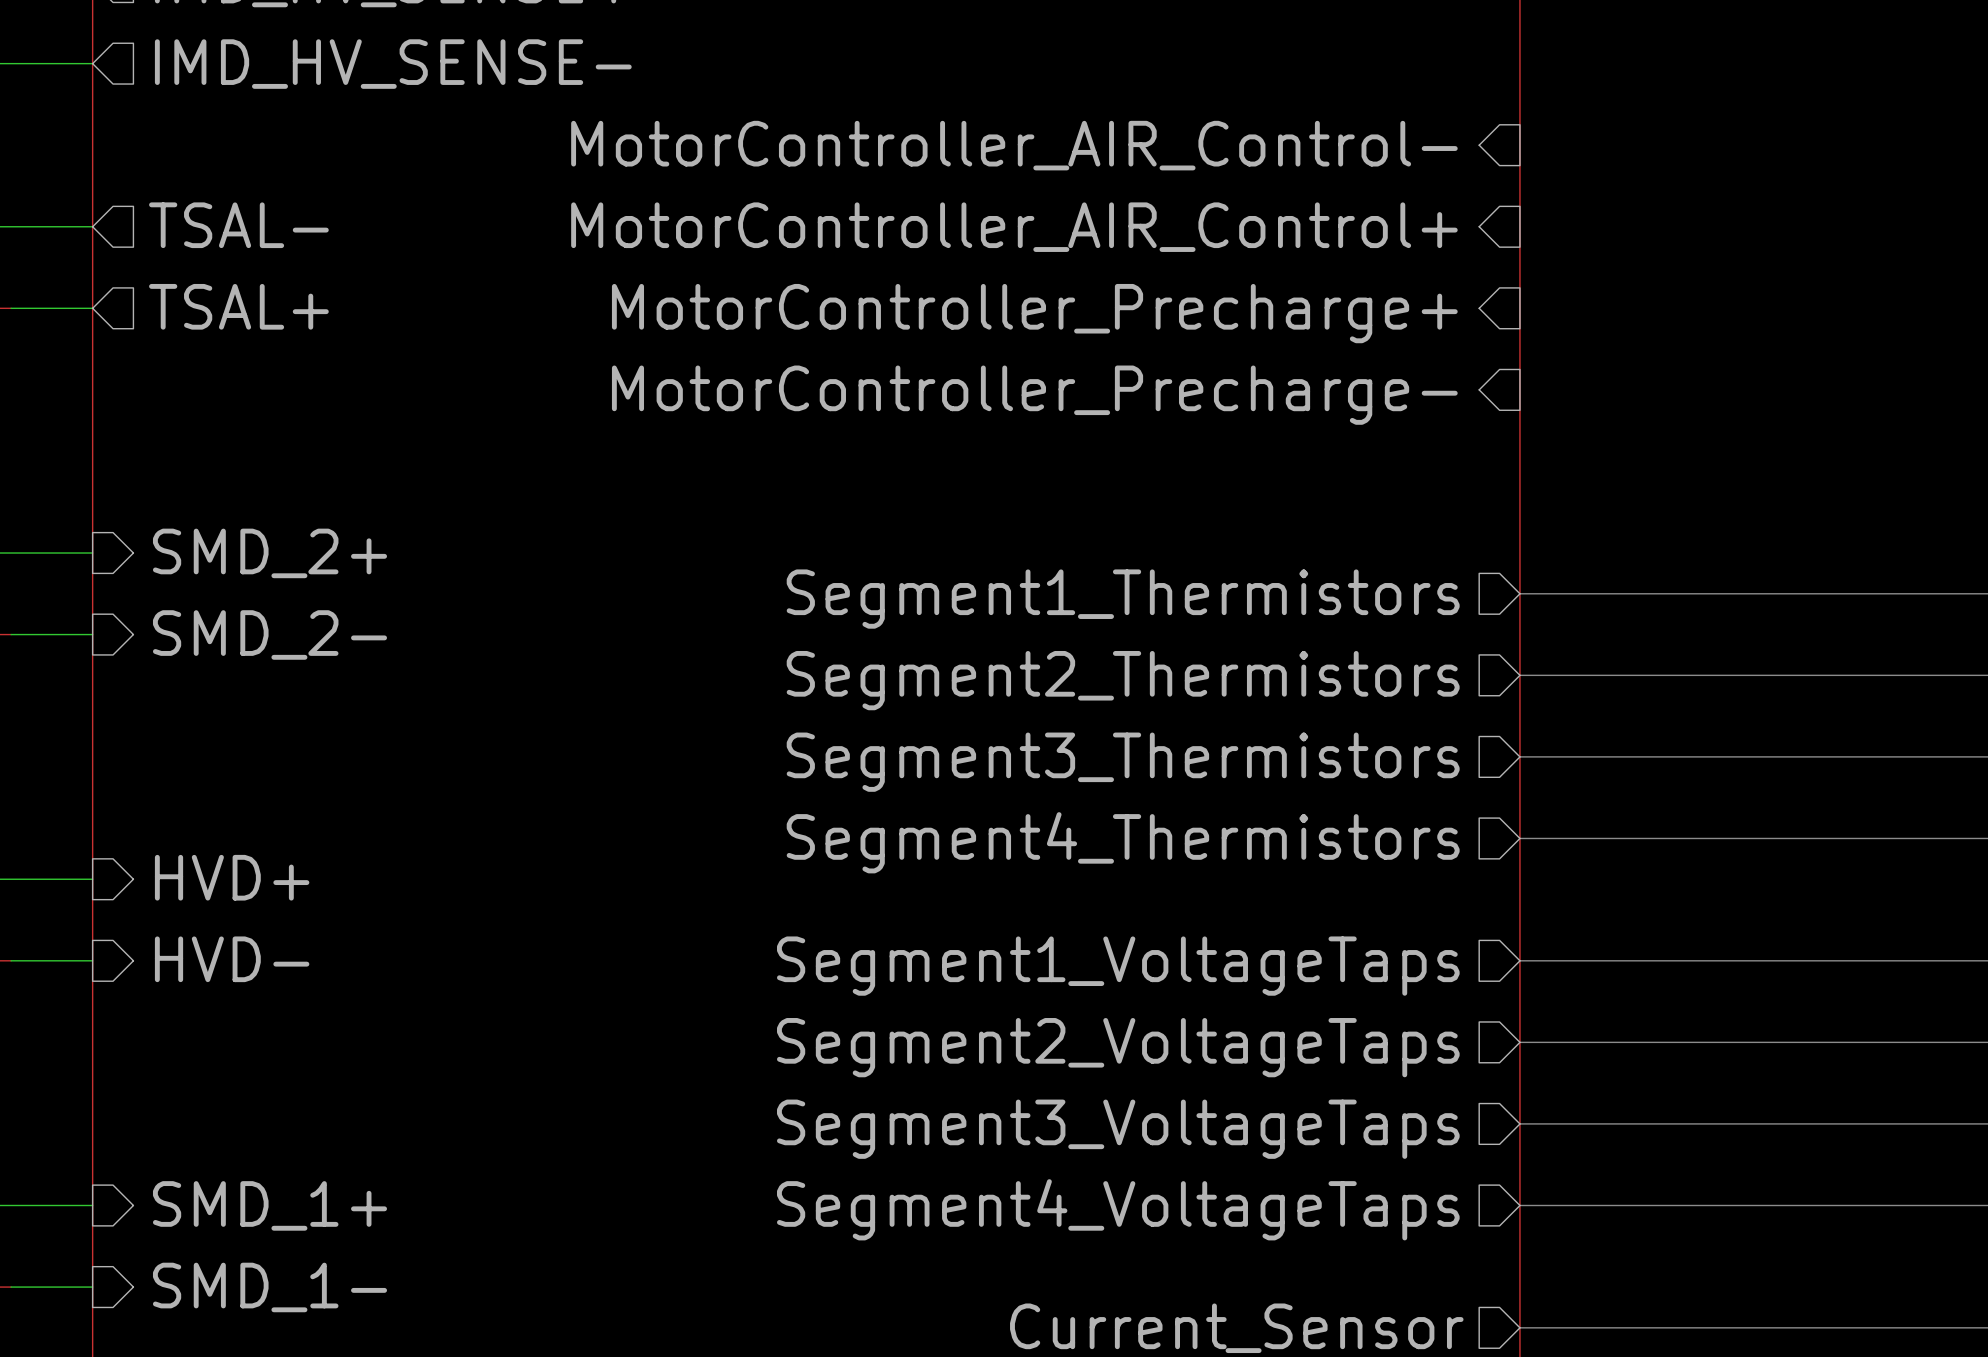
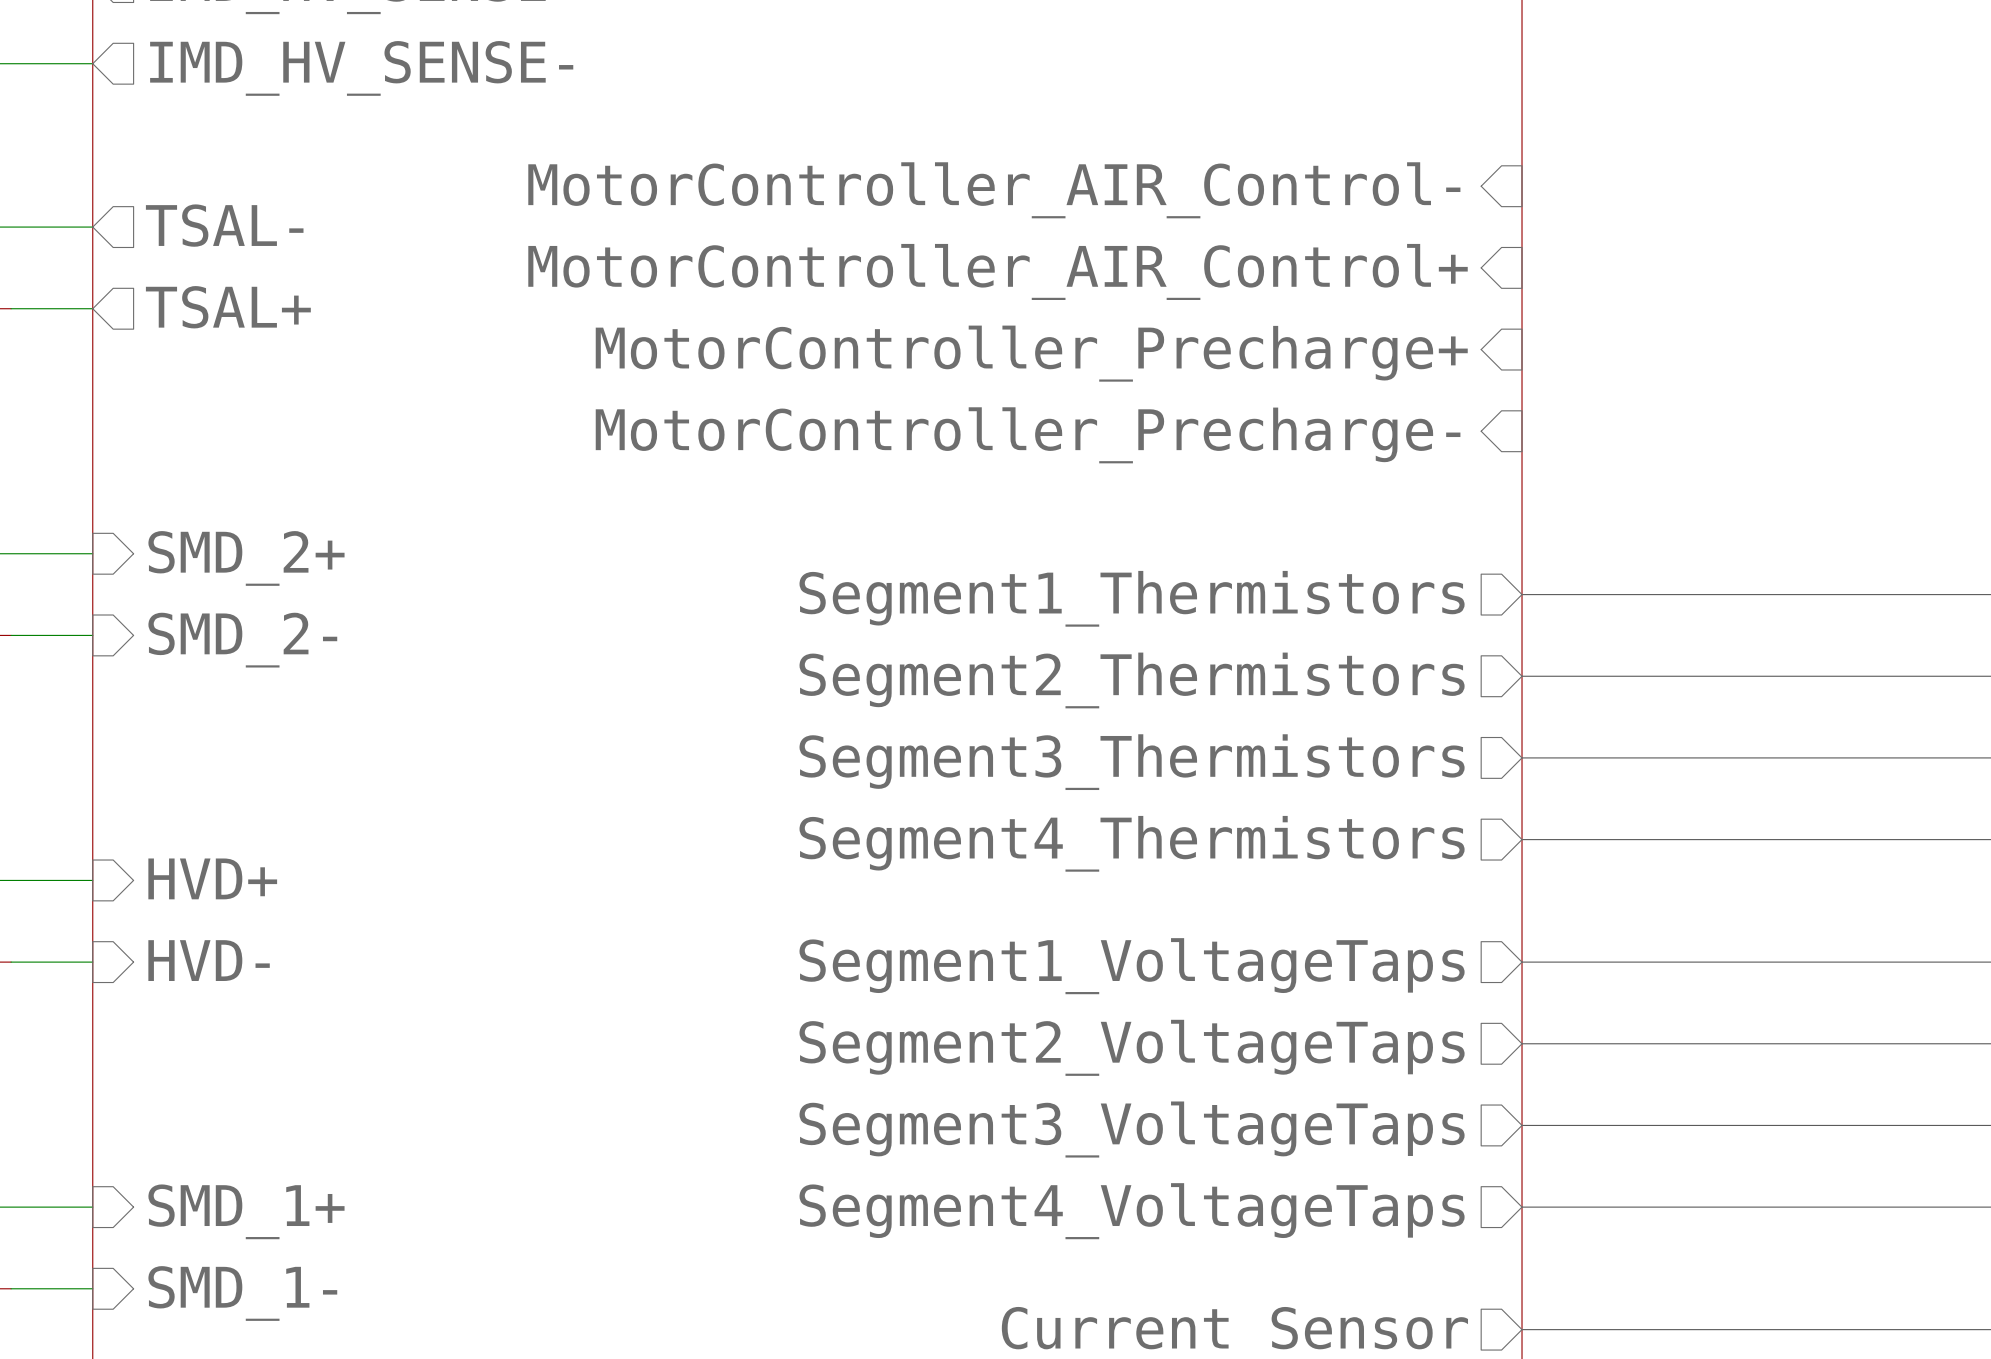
sheet pin position: MotorController_AIR_Control- (1014, 145) -> MotorController_AIR_Control- (994, 190)
sheet pin position: MotorController_AIR_Control+ (1014, 227) -> MotorController_AIR_Control+ (998, 271)
sheet pin position: MotorController_Precharge+ (1034, 313) -> MotorController_Precharge+ (1031, 353)
sheet pin position: MotorController_Precharge- (1034, 395) -> MotorController_Precharge- (1028, 435)

